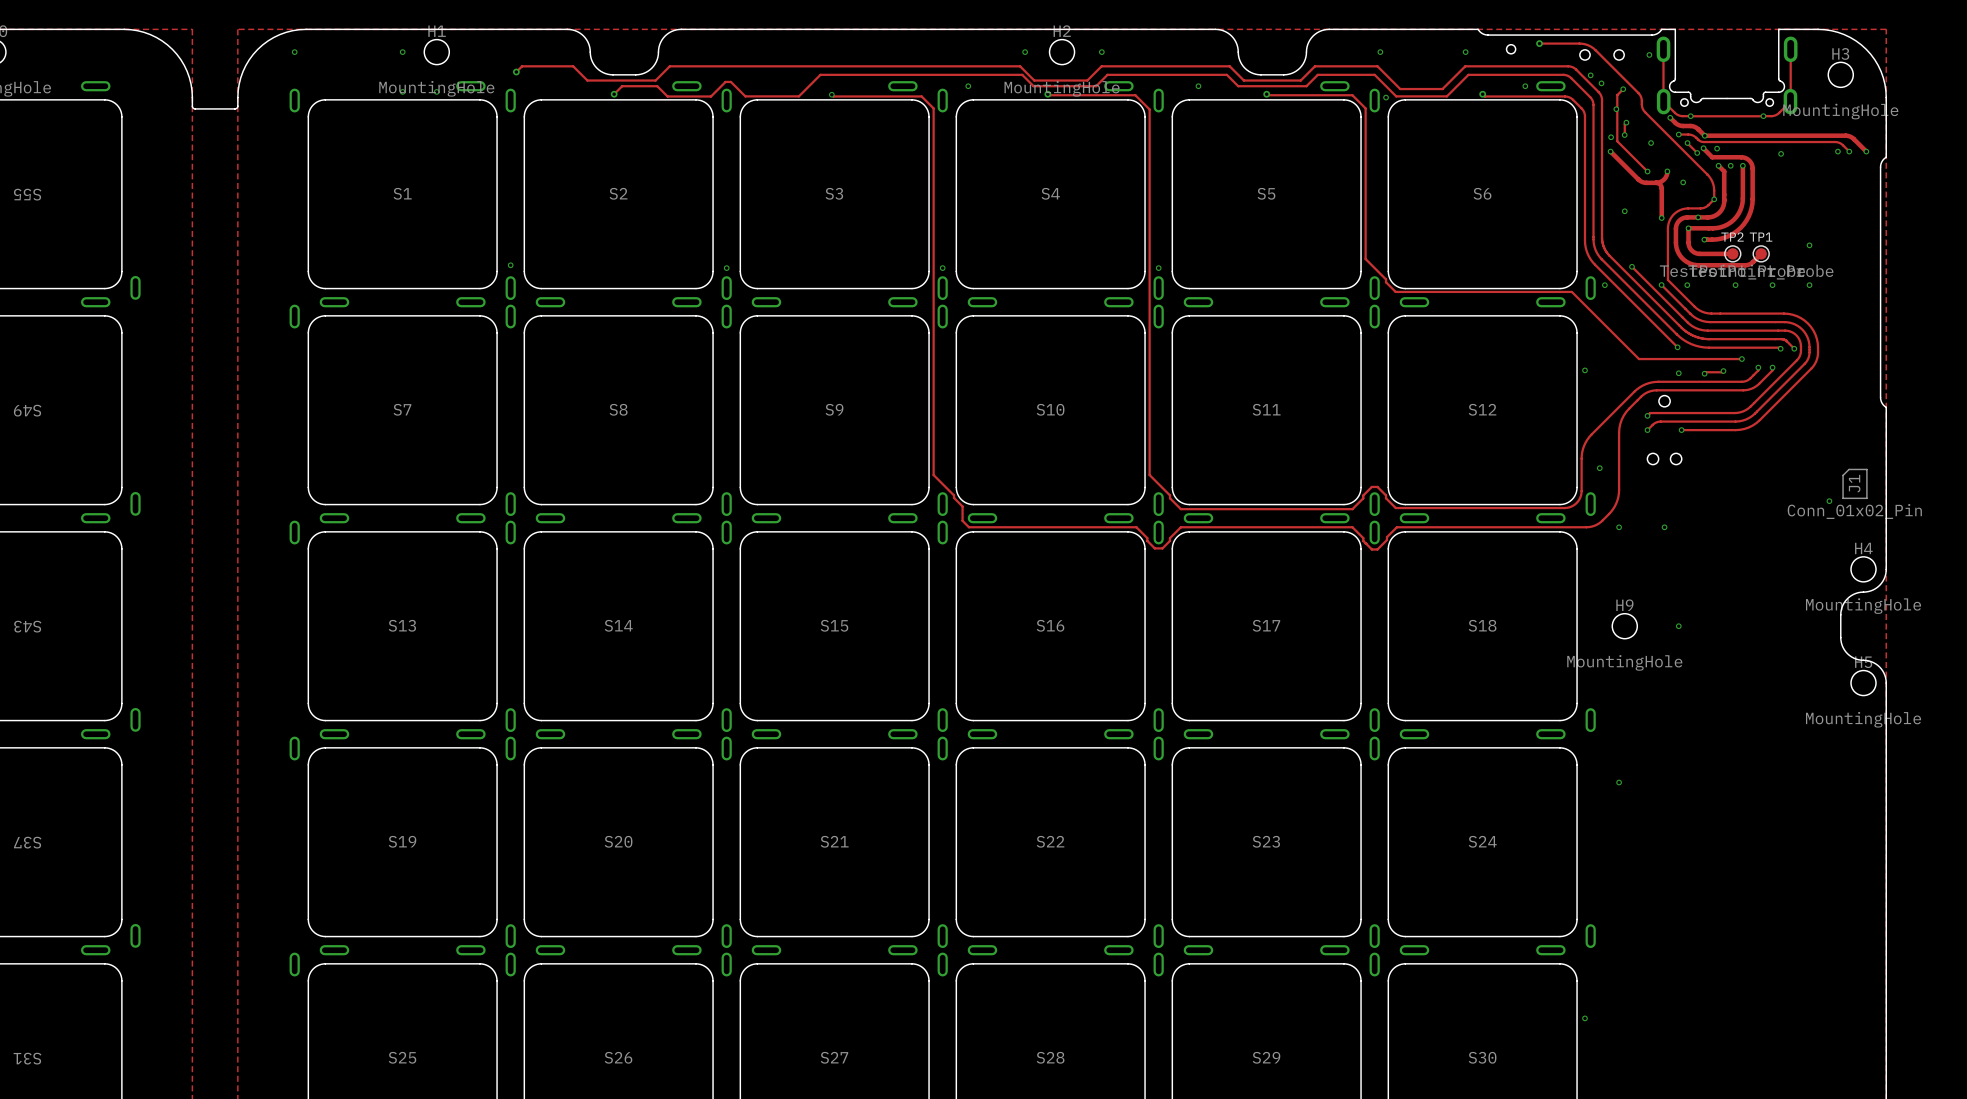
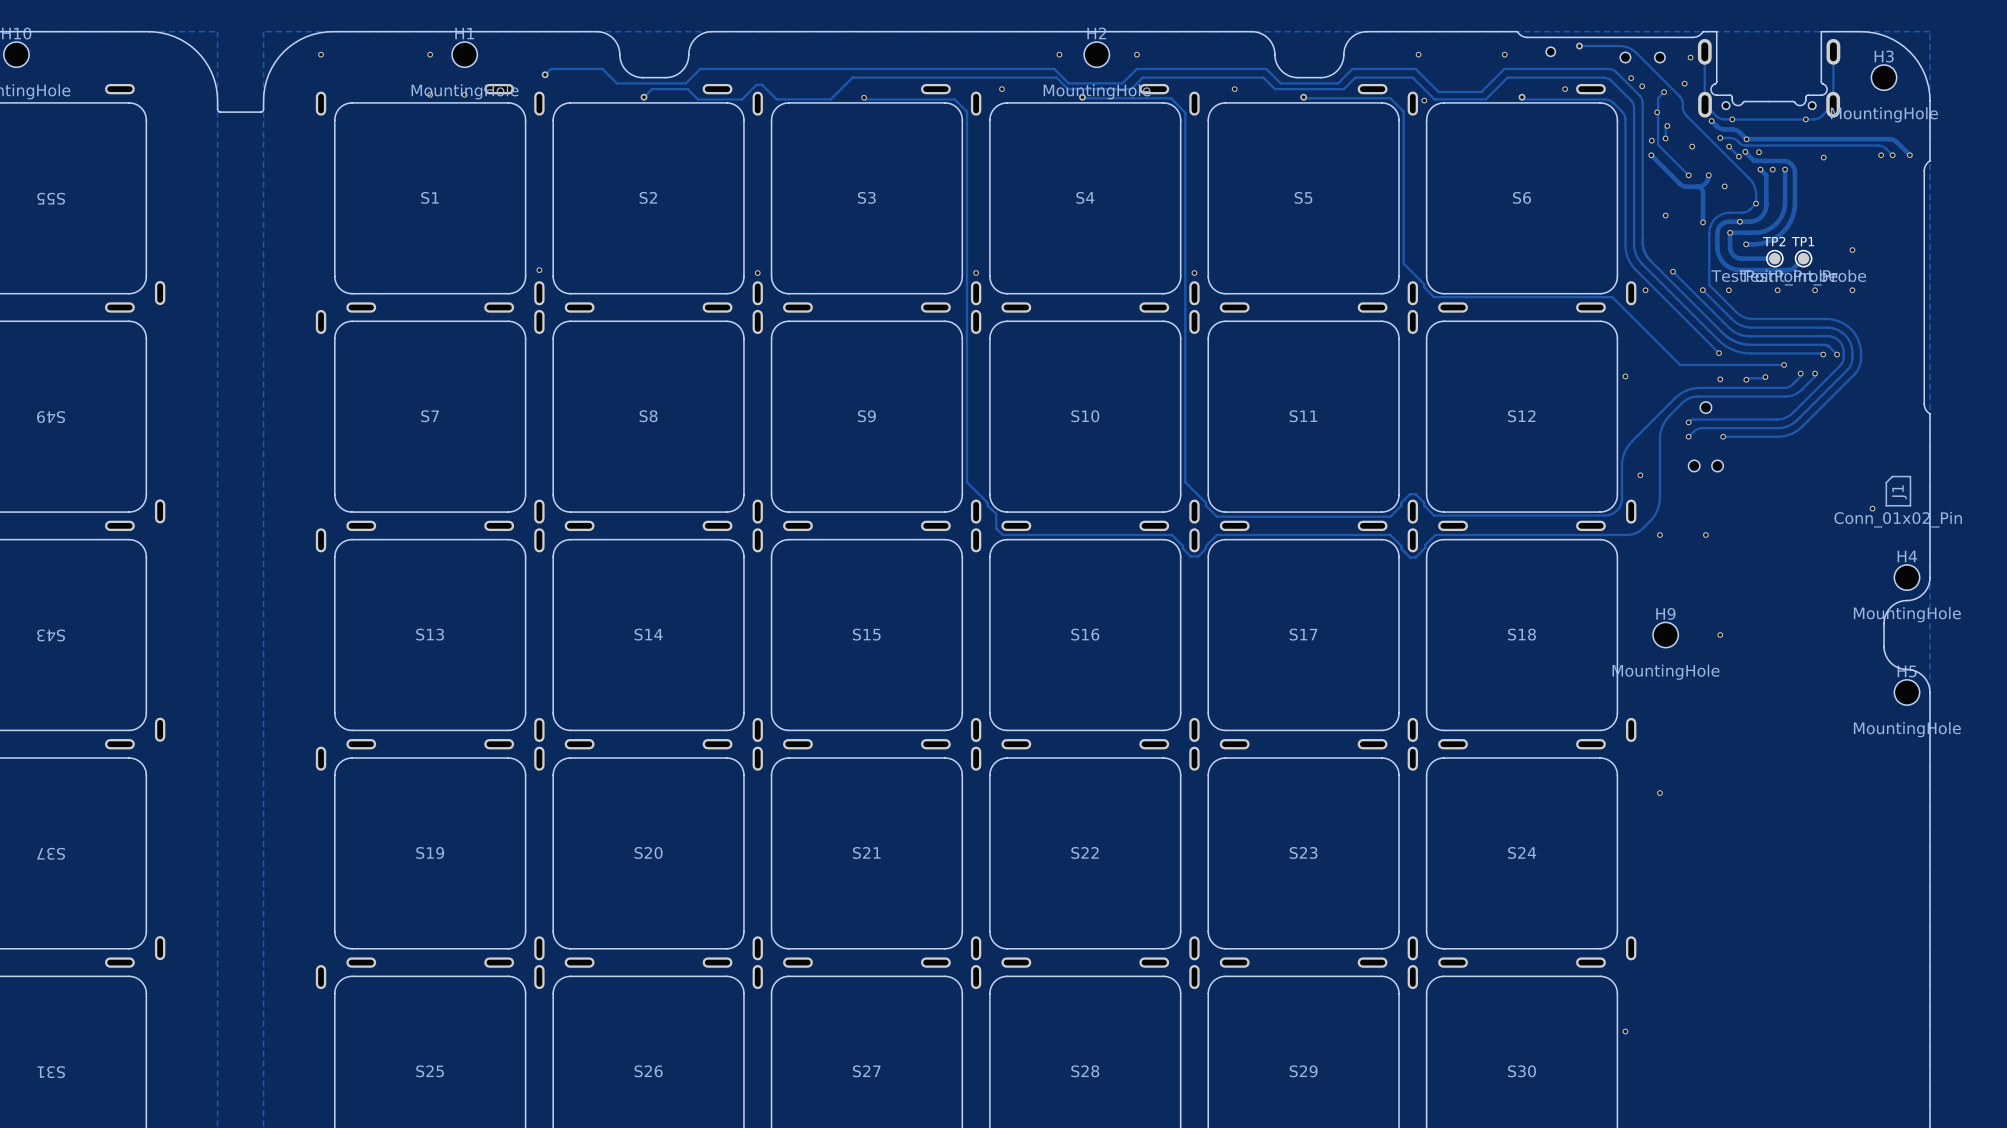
via: none -> (1684, 83)

